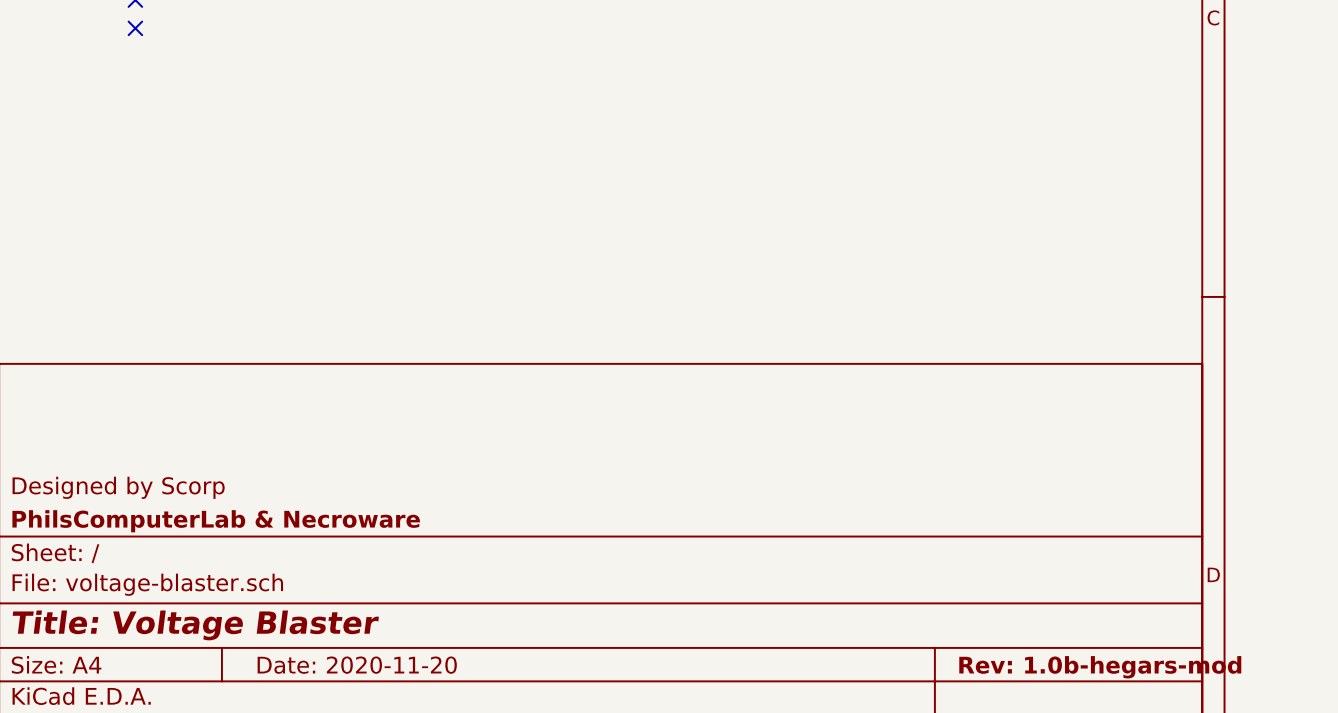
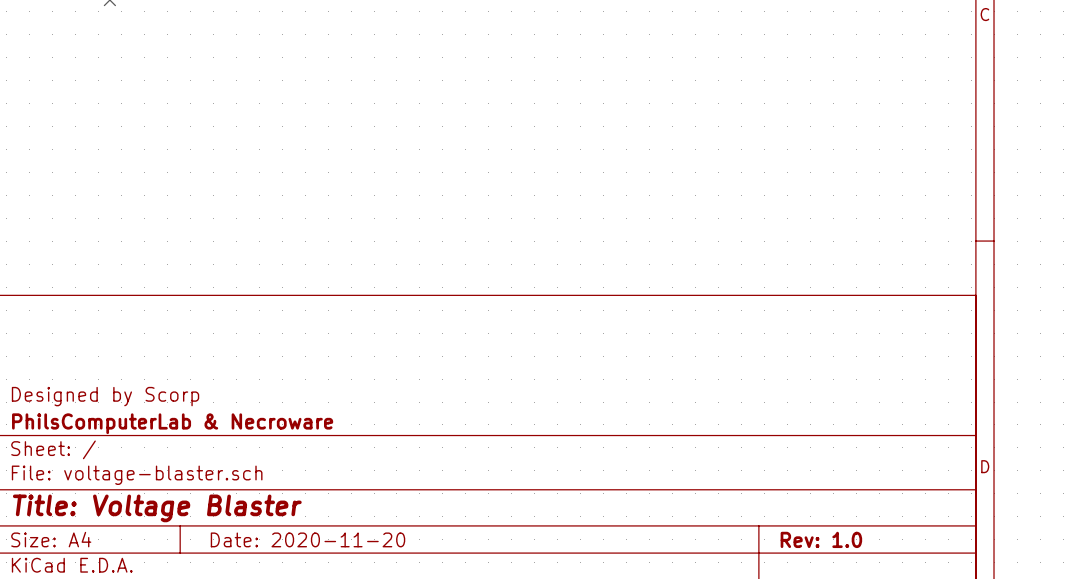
no-connect mark: (135, 28) -> none
title block: Rev: 1.0b-hegars-mod (1100, 667) -> Rev: 1.0 (821, 539)

